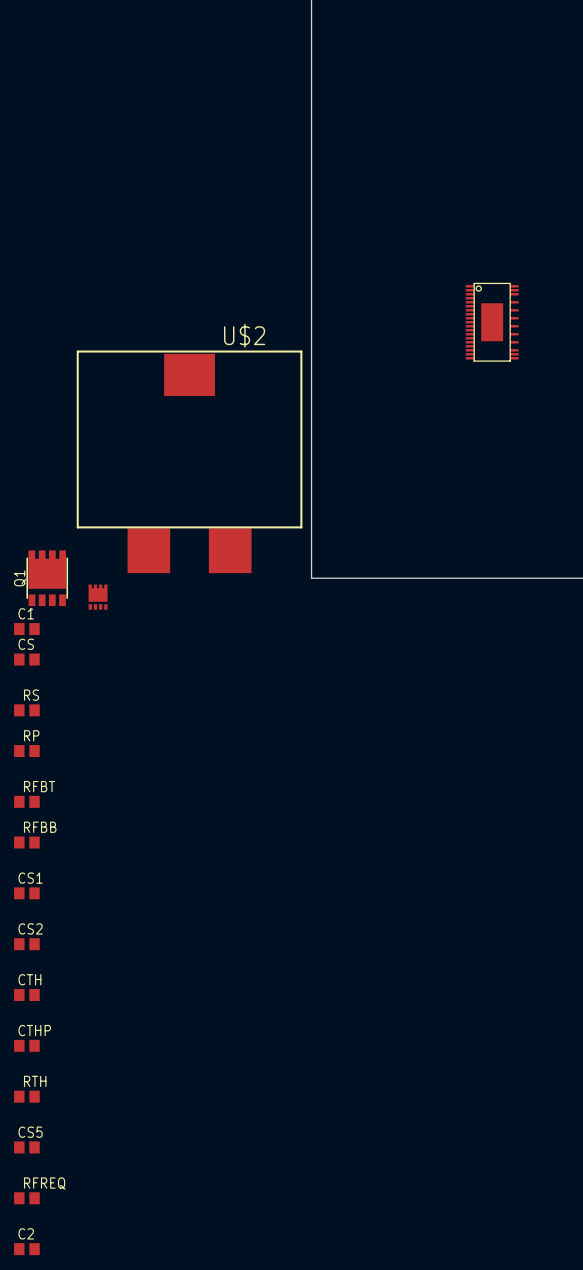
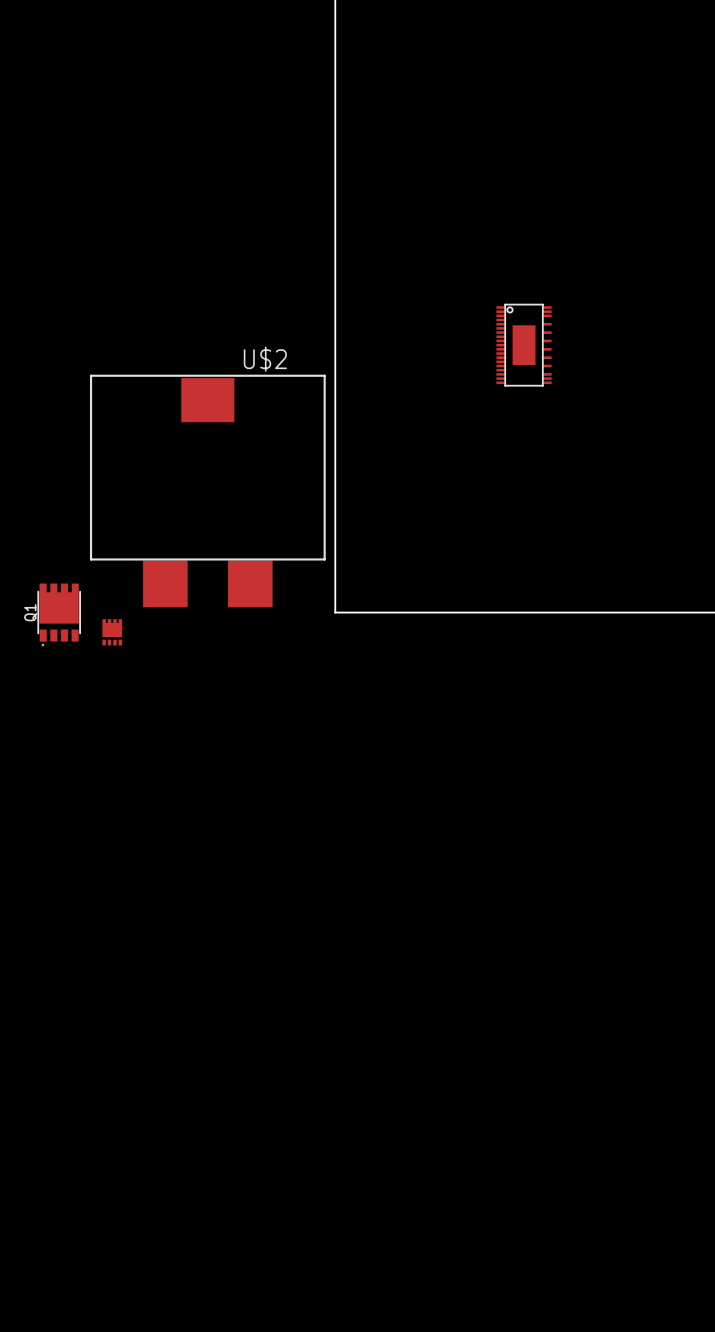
C1: (26, 629) -> none
CS: (26, 659) -> none
RS: (26, 710) -> none
RP: (26, 751) -> none
RFBT: (26, 801) -> none
RFBB: (26, 842) -> none
CS1: (26, 893) -> none
CS2: (26, 944) -> none
CTH: (26, 994) -> none
CTHP: (26, 1045) -> none
RTH: (26, 1096) -> none
CS5: (26, 1147) -> none
RFREQ: (26, 1198) -> none
C2: (26, 1249) -> none

